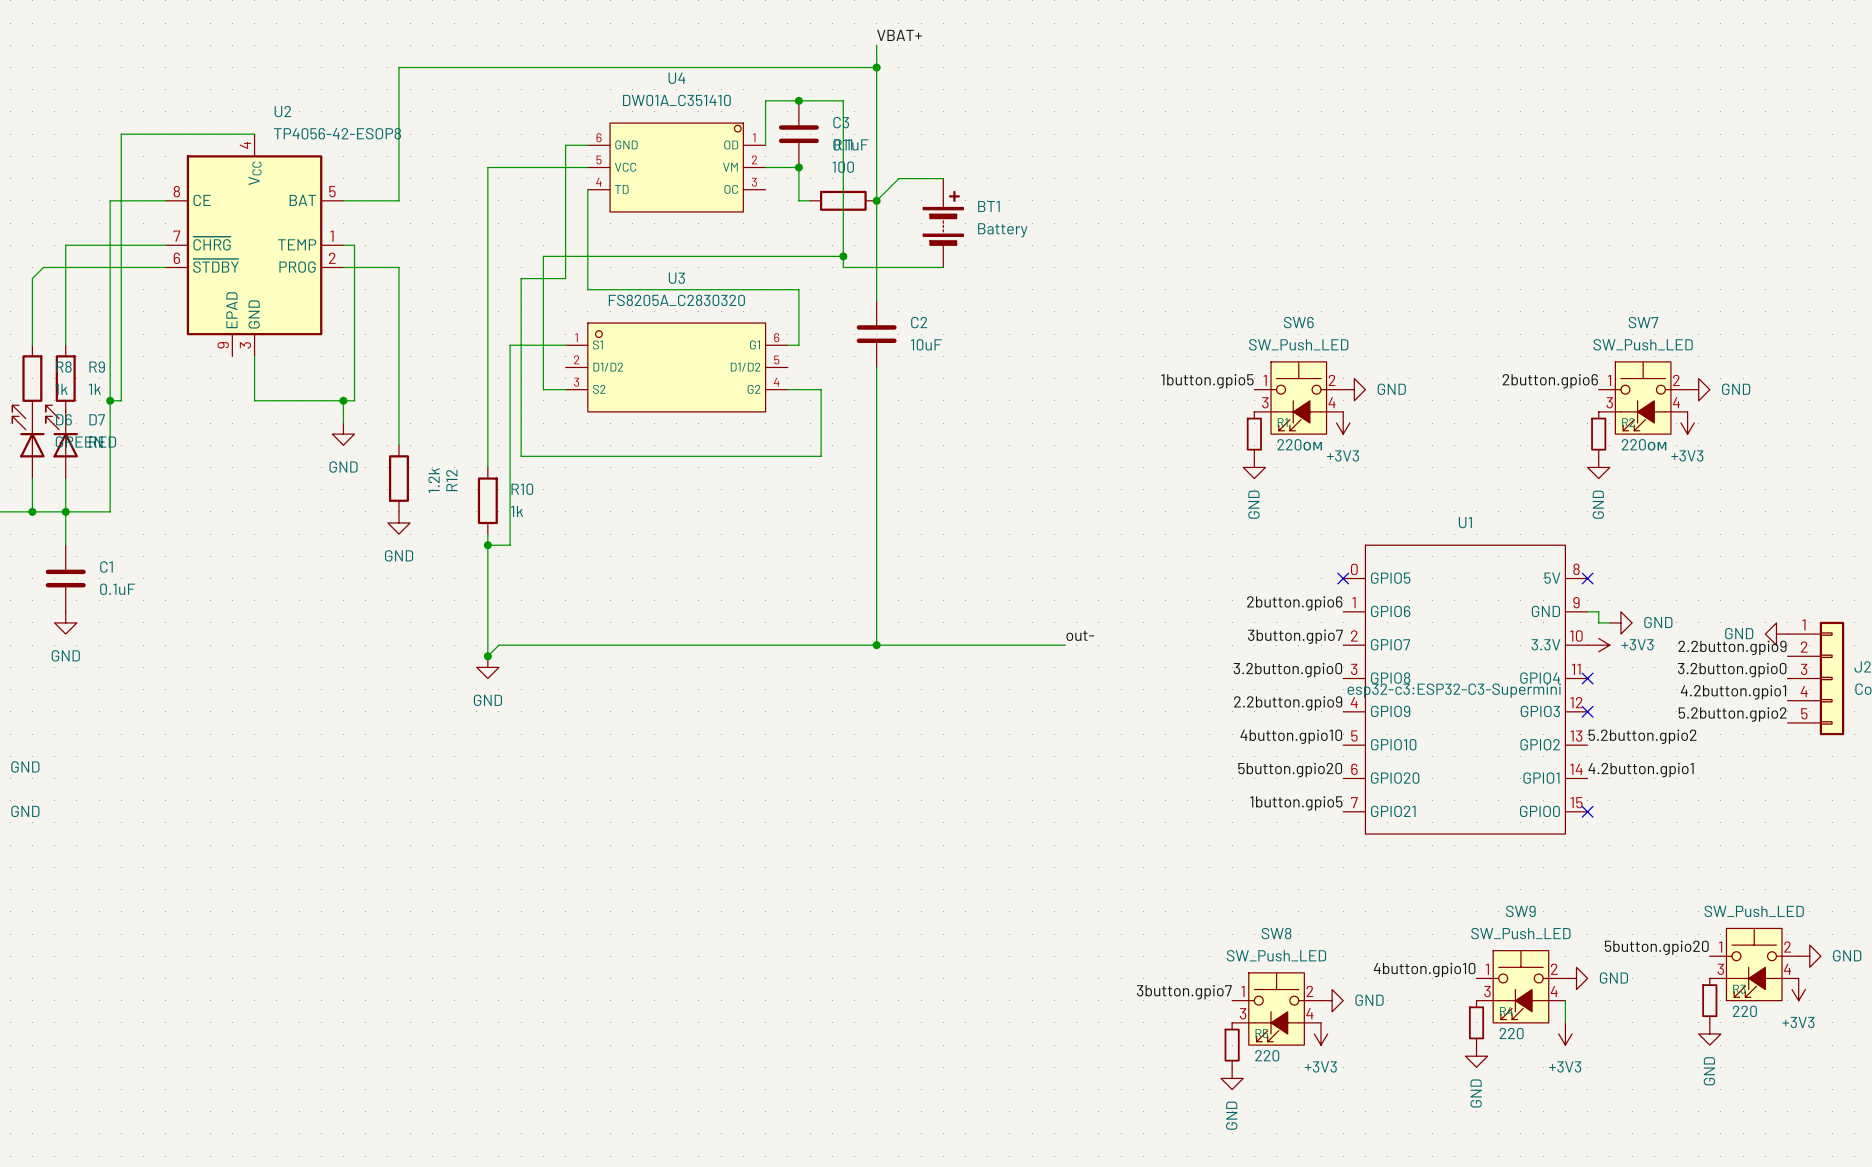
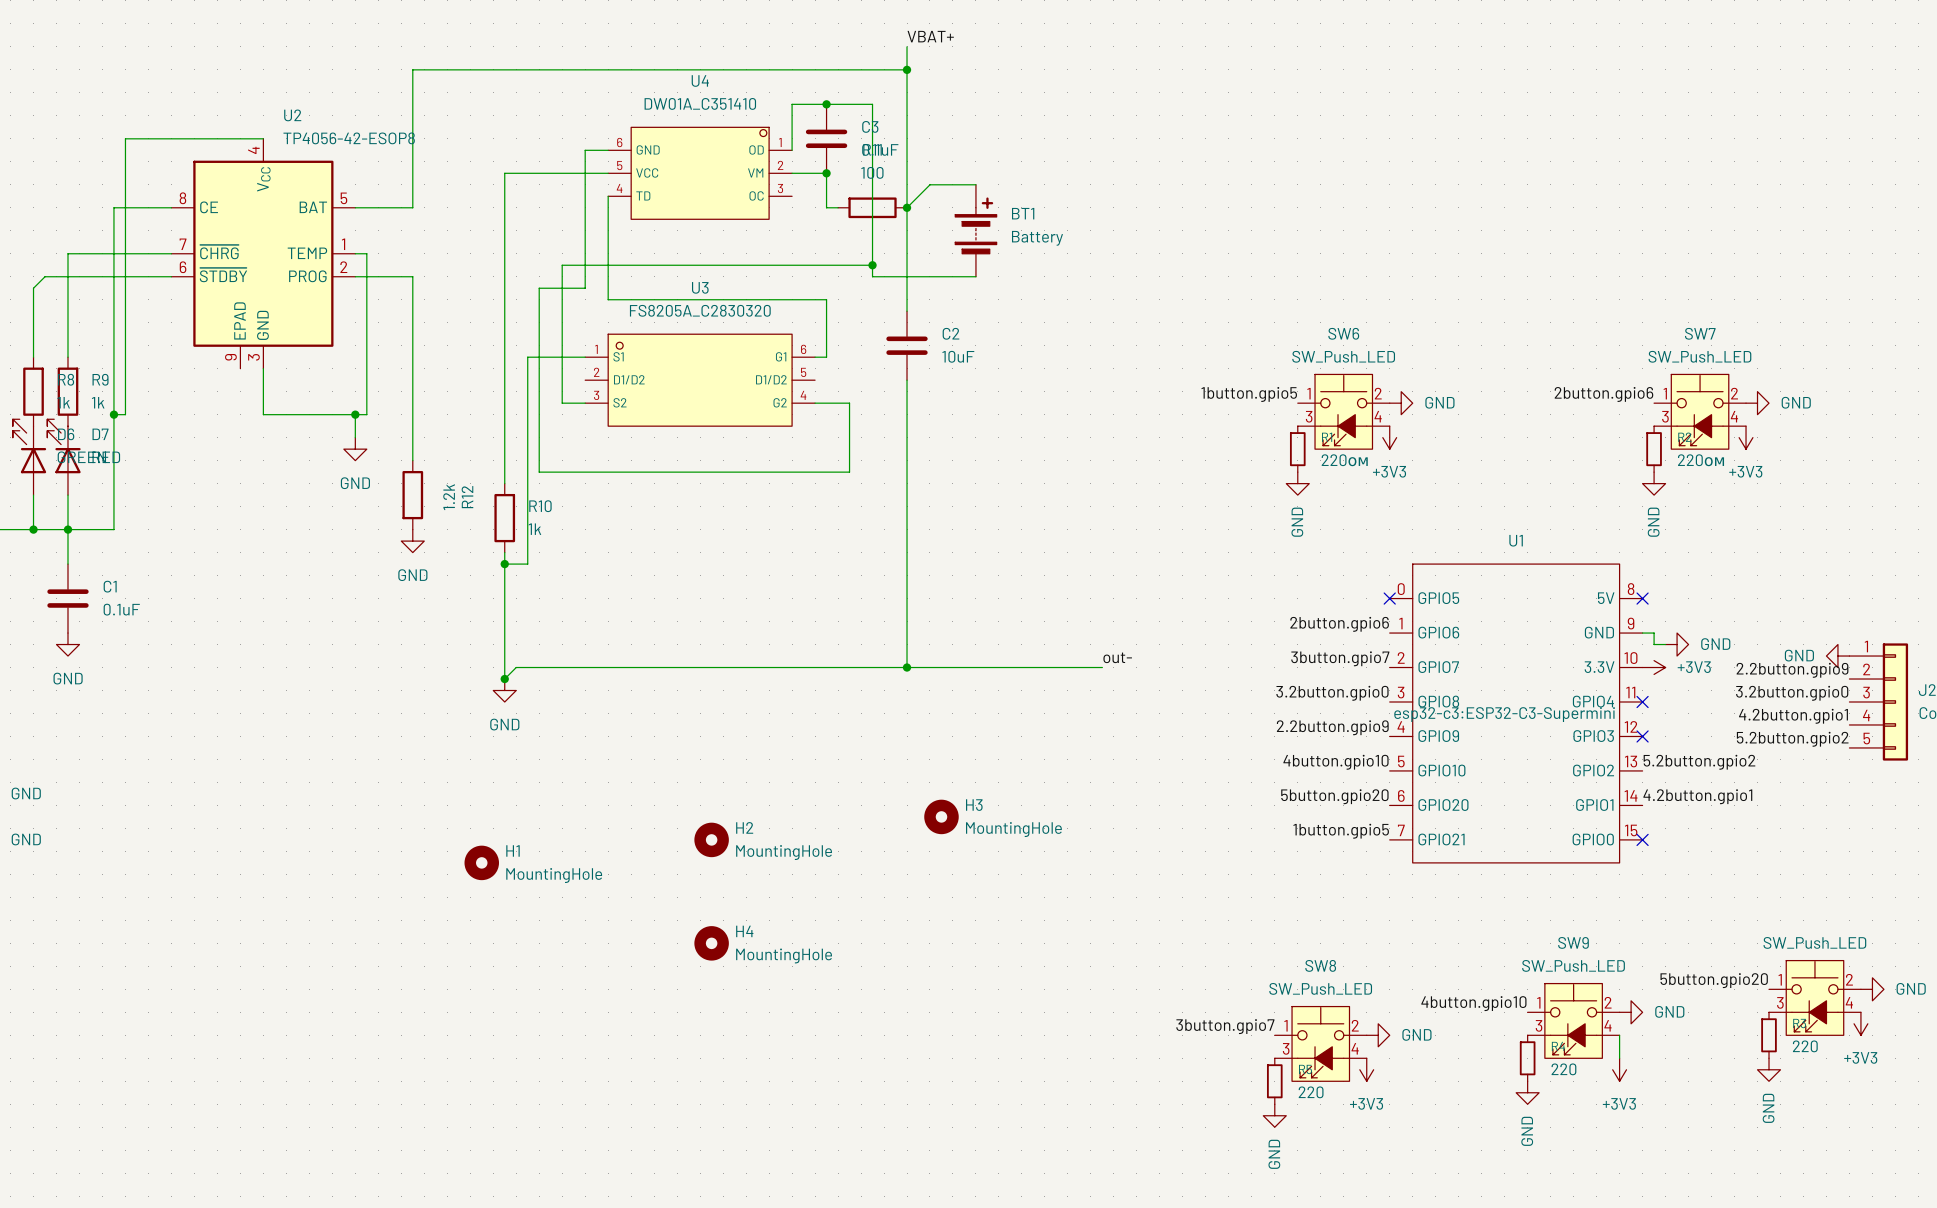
H3: none -> MountingHole (941, 816)
H2: none -> MountingHole (711, 839)
H1: none -> MountingHole (481, 862)
H4: none -> MountingHole (711, 943)

